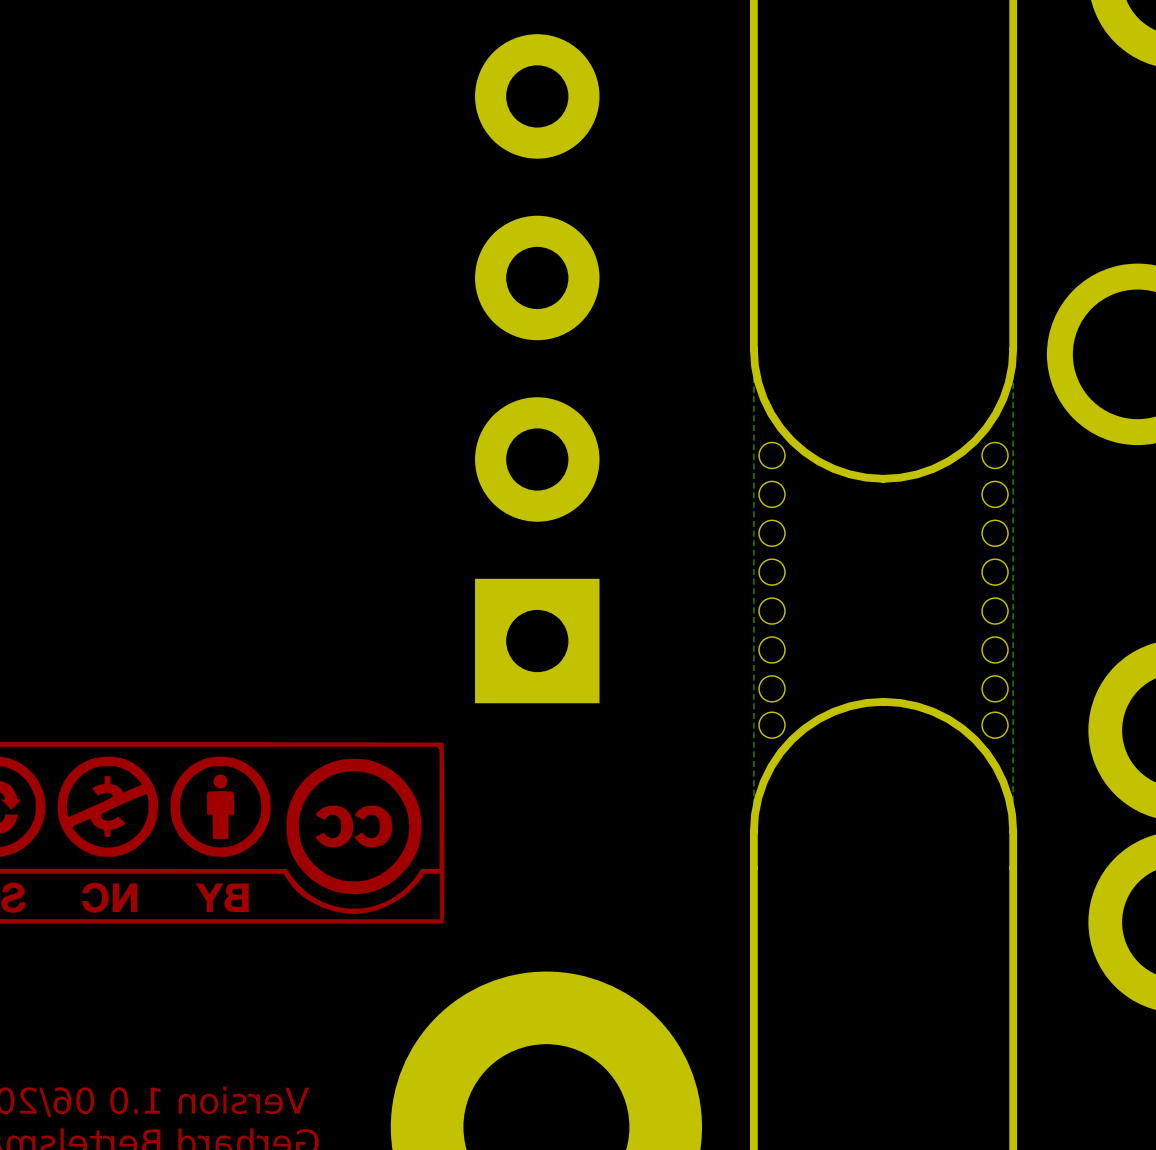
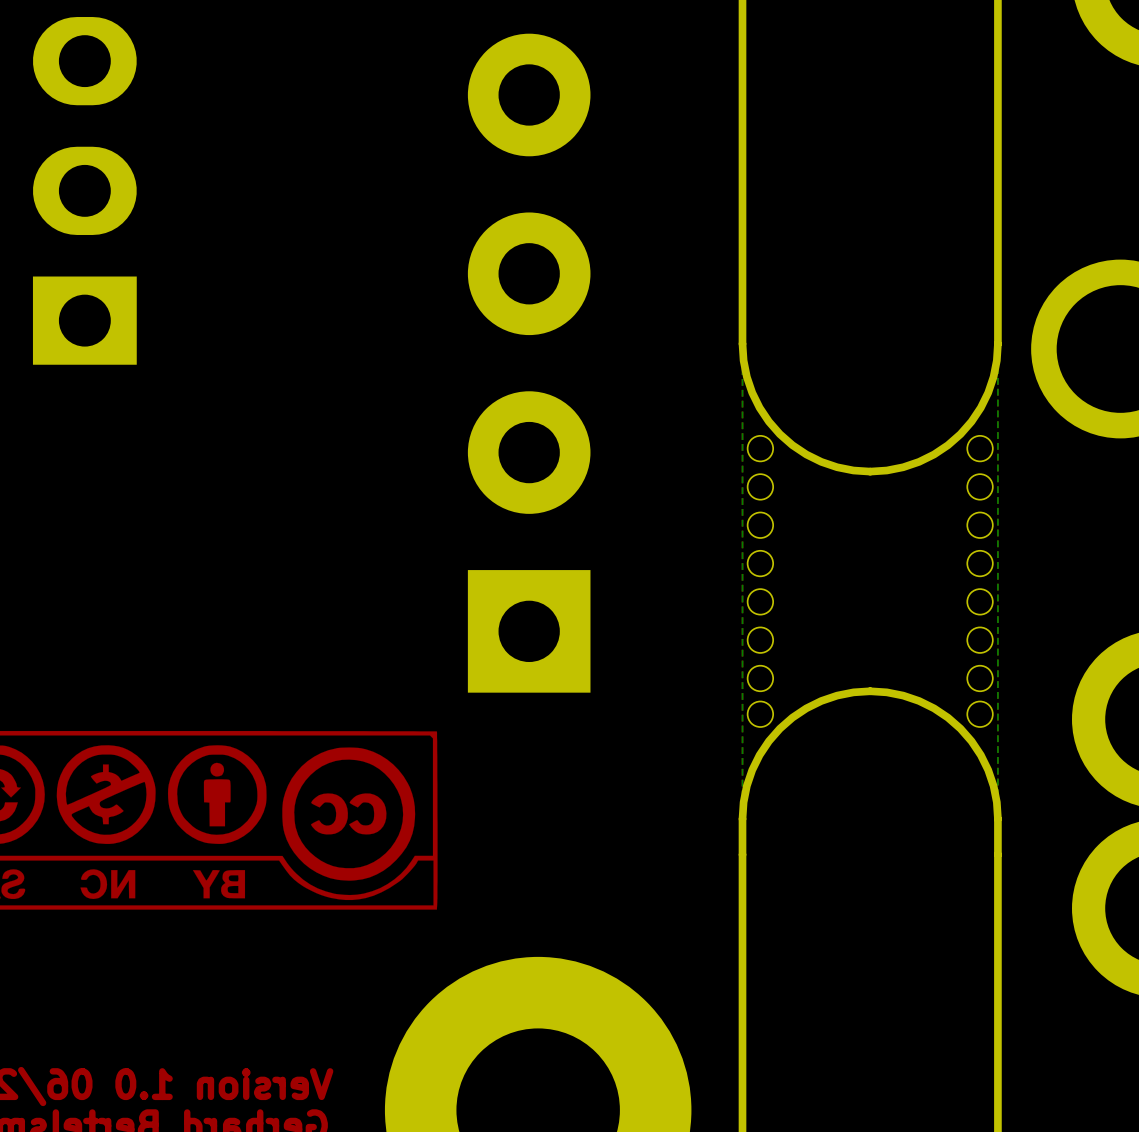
part: none -> (84, 190)

